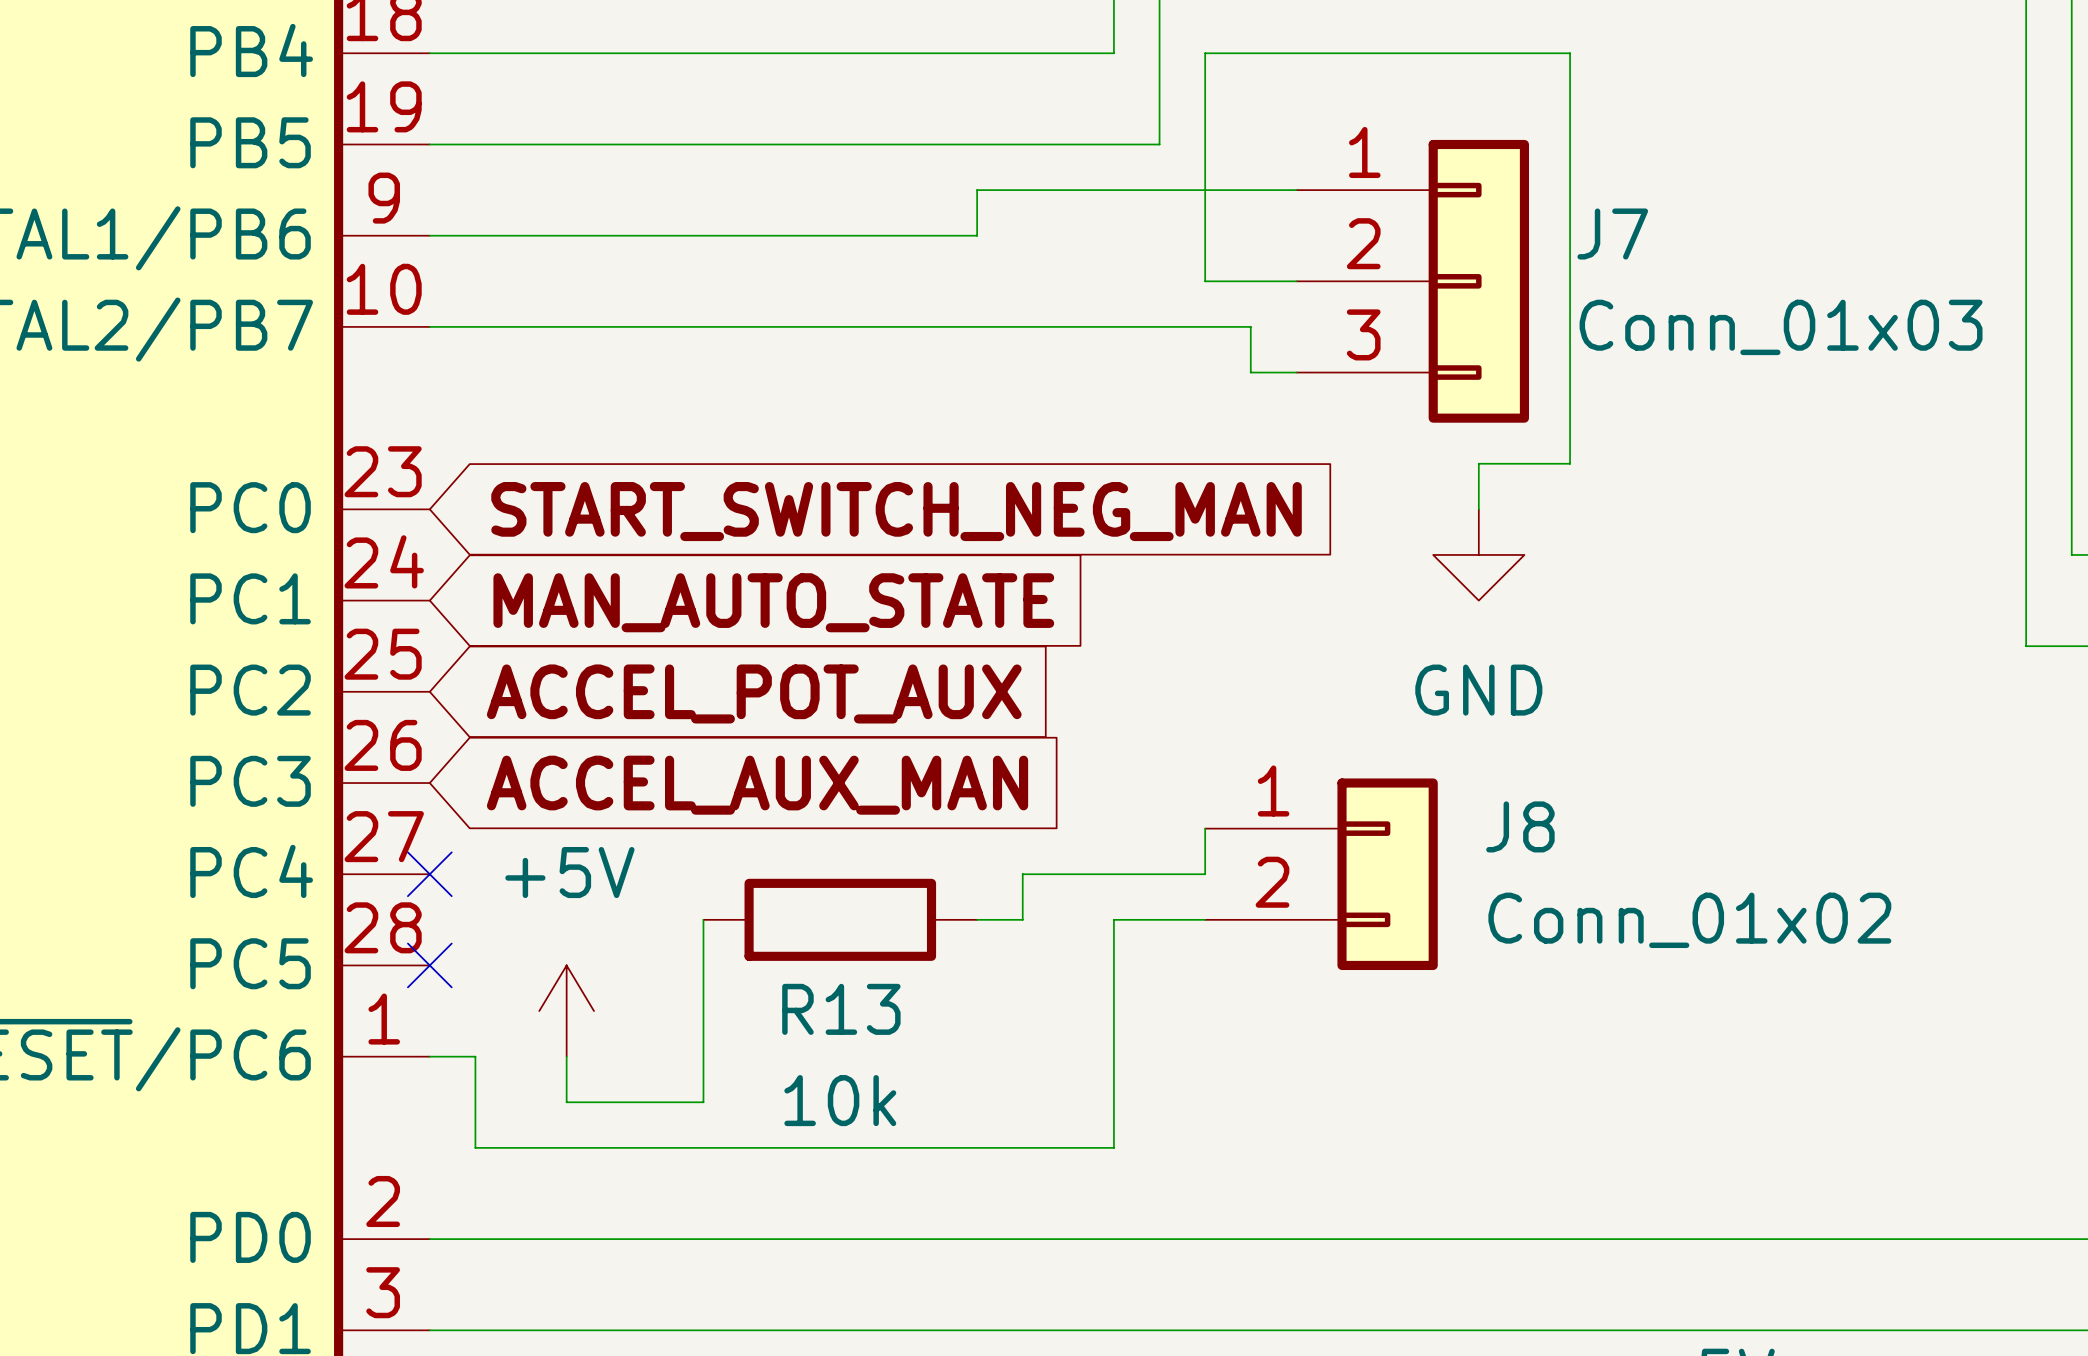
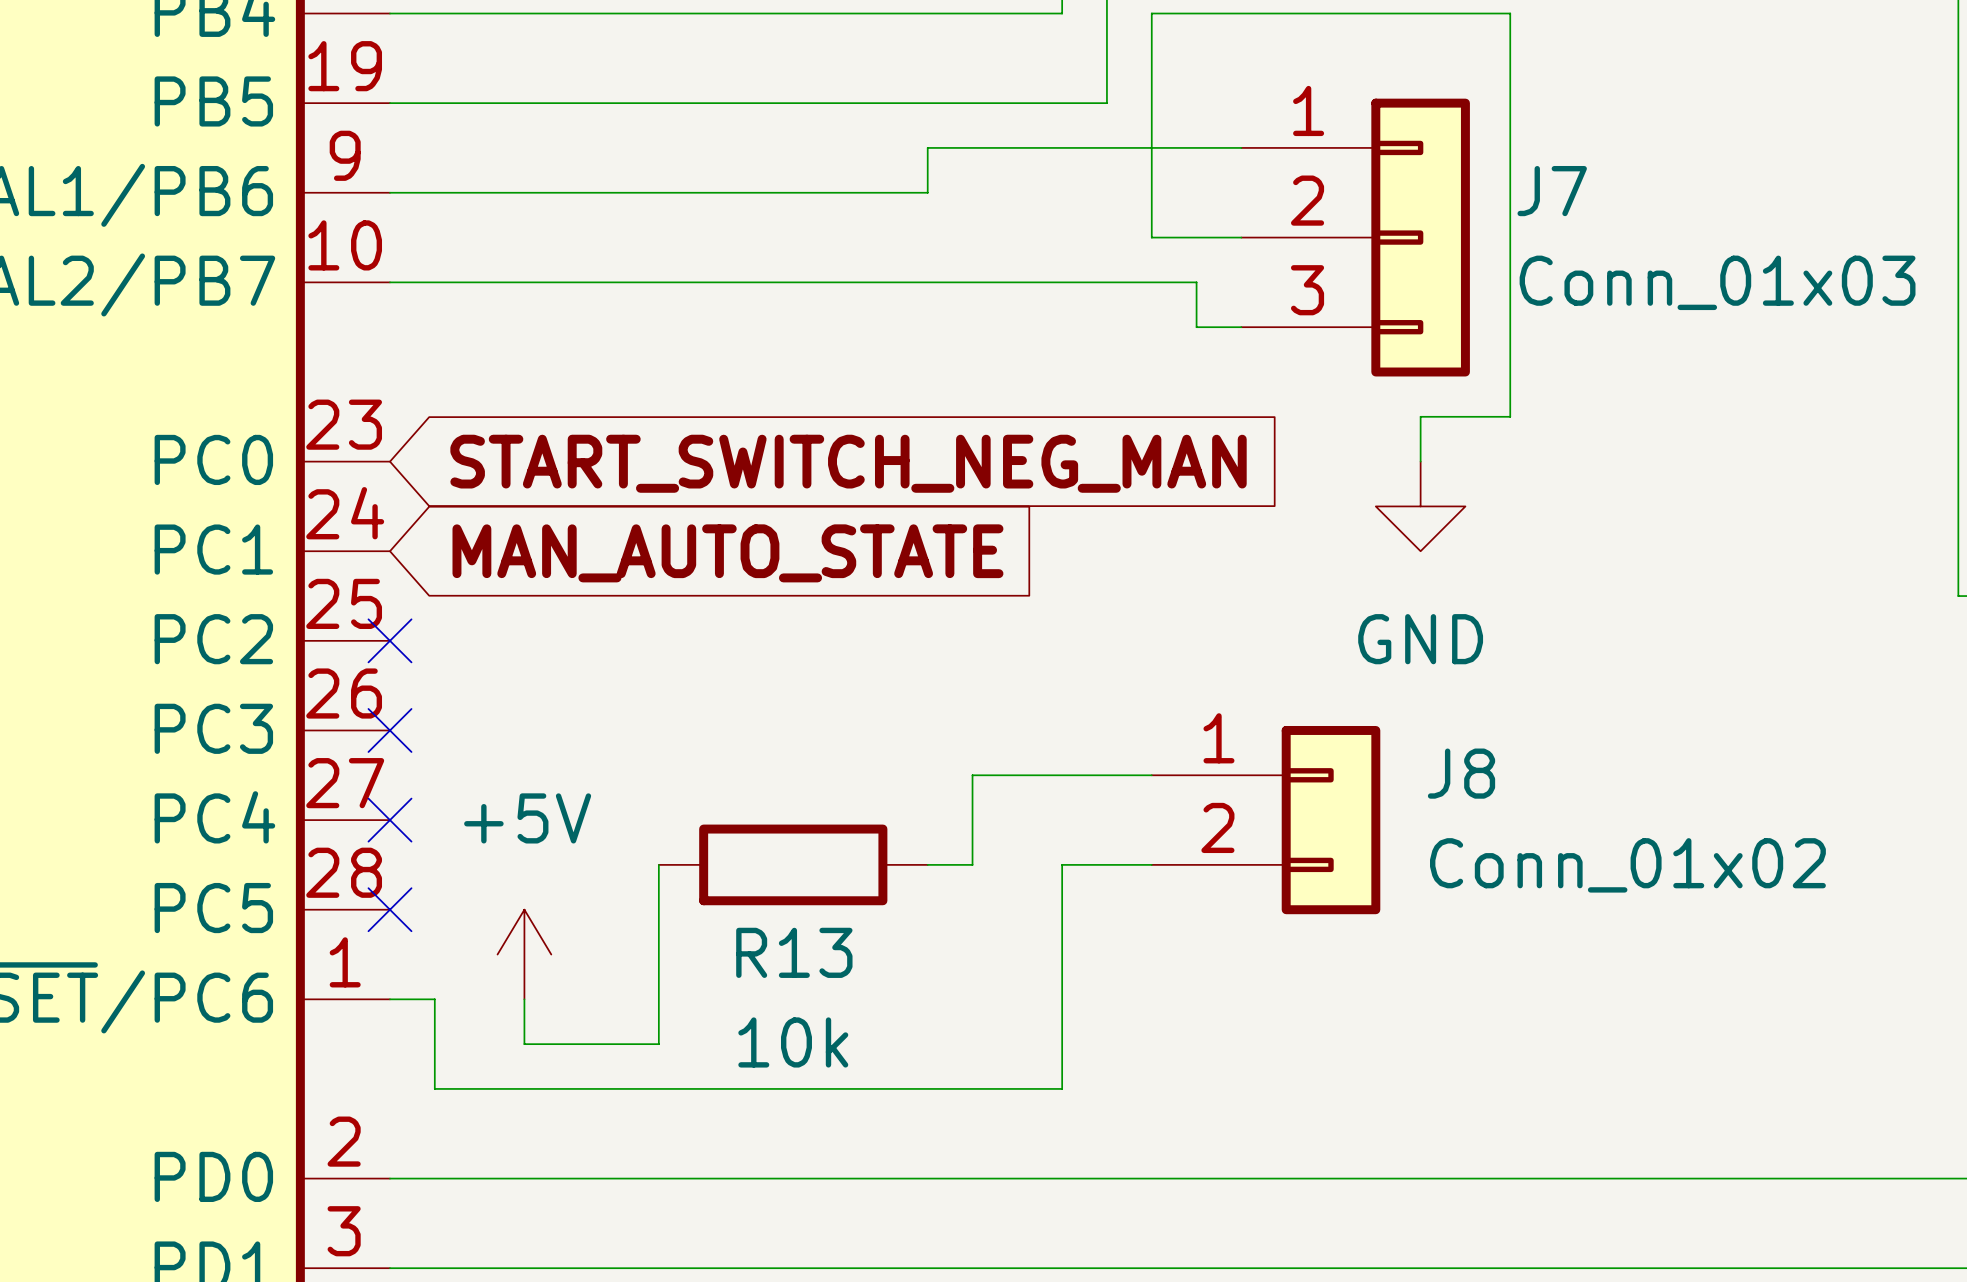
no-connect mark: none -> (389, 640)
global label: ACCEL_POT_AUX (754, 693) -> none
no-connect mark: none -> (389, 730)
global label: ACCEL_AUX_MAN (757, 785) -> none
wire: (1205, 828) (1205, 874) (1022, 874) -> (1151, 775) (972, 775) (972, 820)

